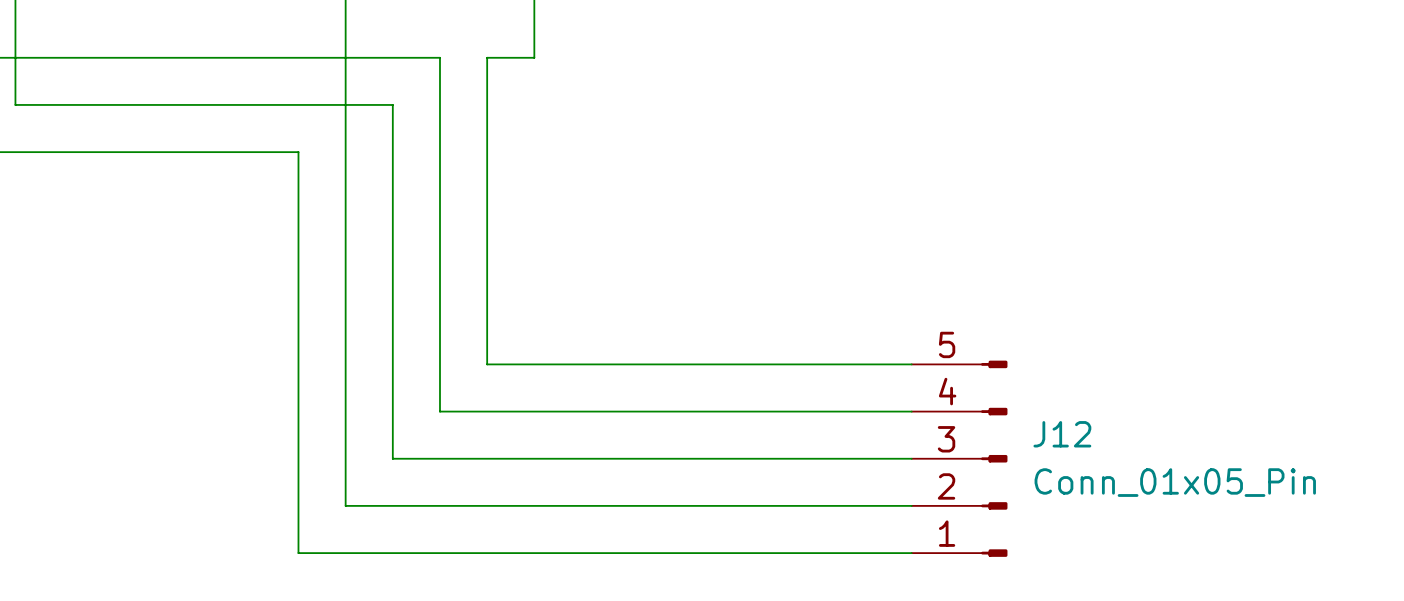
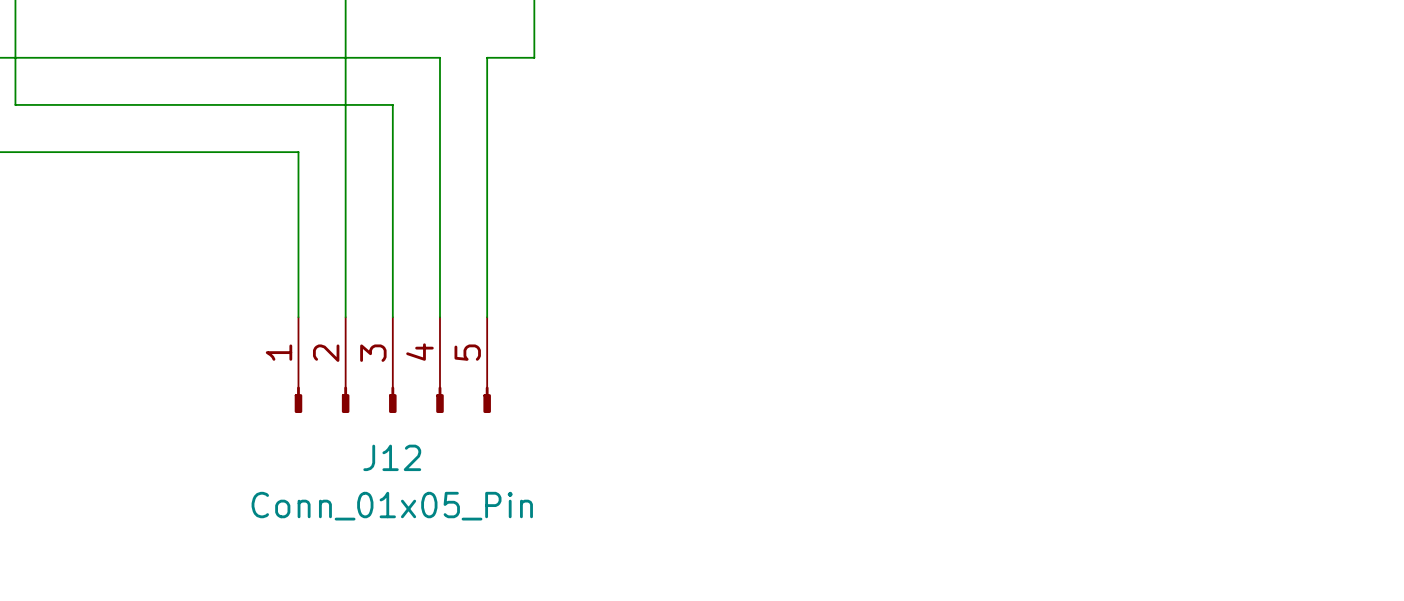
wire: (298, 317) (298, 553) (911, 553) -> none
wire: (345, 317) (345, 505) (911, 505) -> none
wire: (392, 317) (392, 458) (911, 458) -> none
wire: (439, 317) (439, 411) (911, 411) -> none
wire: (487, 317) (487, 364) (911, 364) -> none
J12 position: (959, 458) -> (392, 365)
J12 rotation: 0° (994, 458) -> 90° clockwise (392, 399)
J12 value position: Conn_01x05_Pin (1175, 482) -> Conn_01x05_Pin (392, 506)

